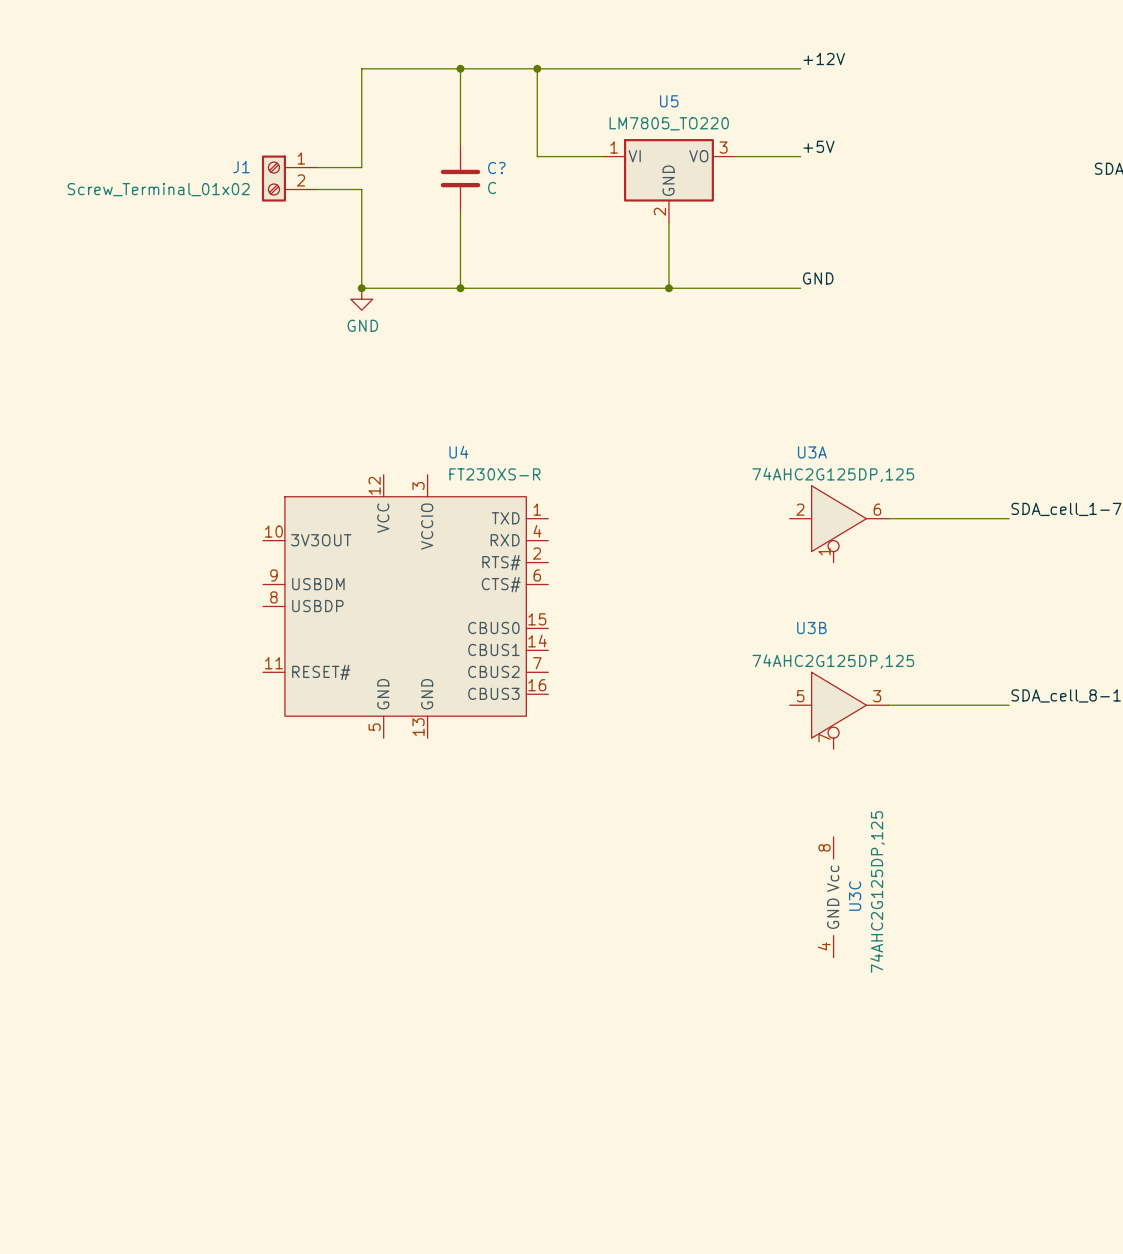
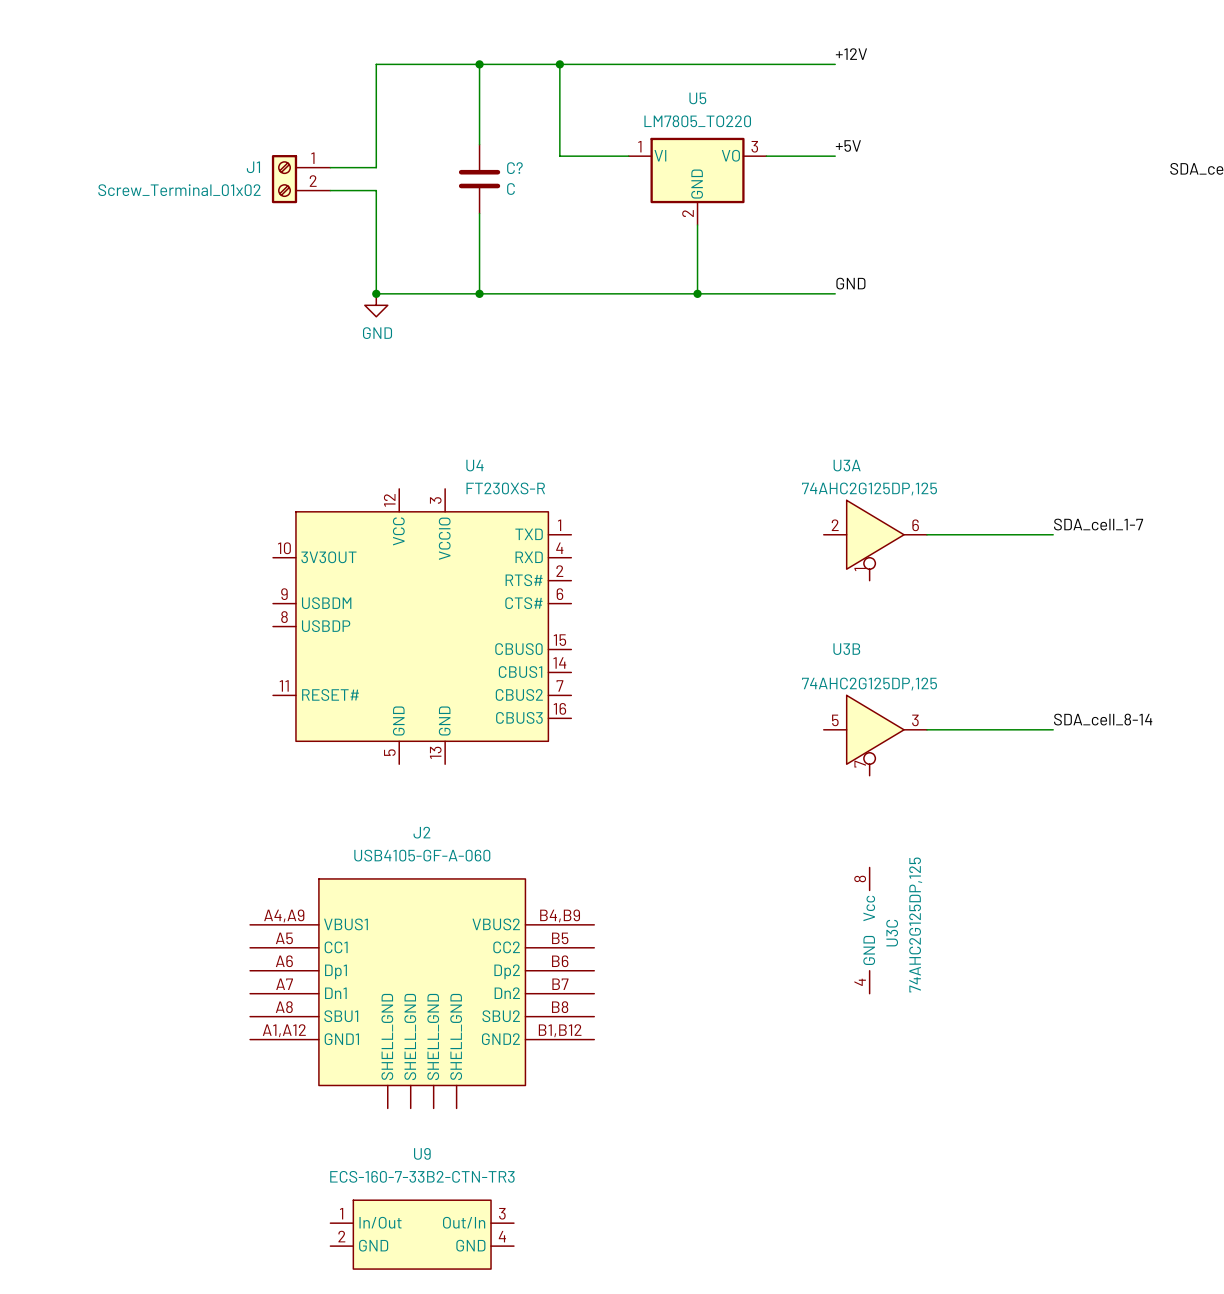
J2: none -> USB4105-GF-A-060 (422, 993)
U9: none -> ECS-160-7-33B2-CTN-TR3 (422, 1234)

